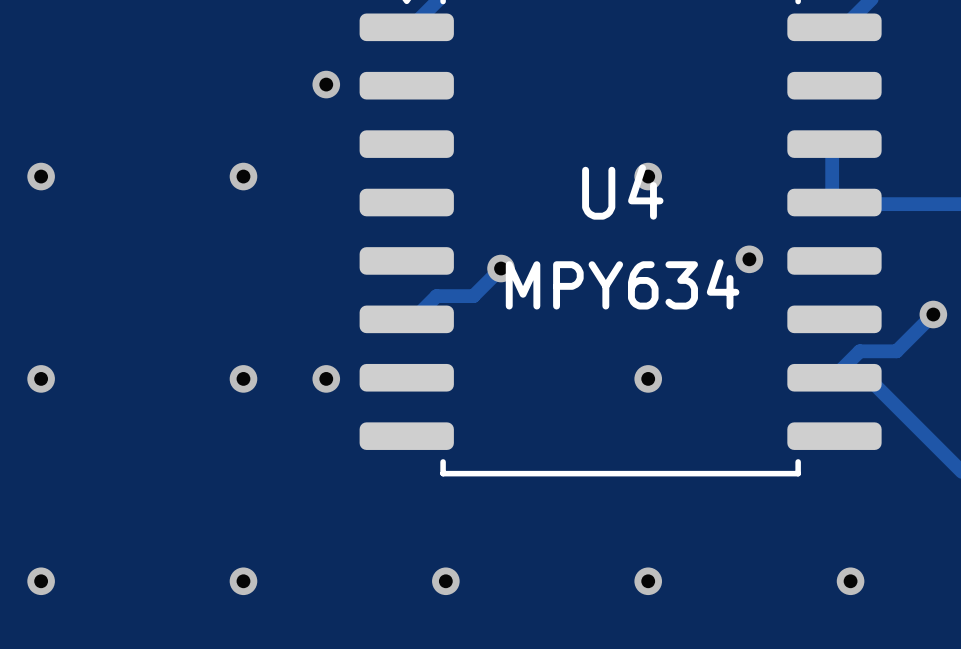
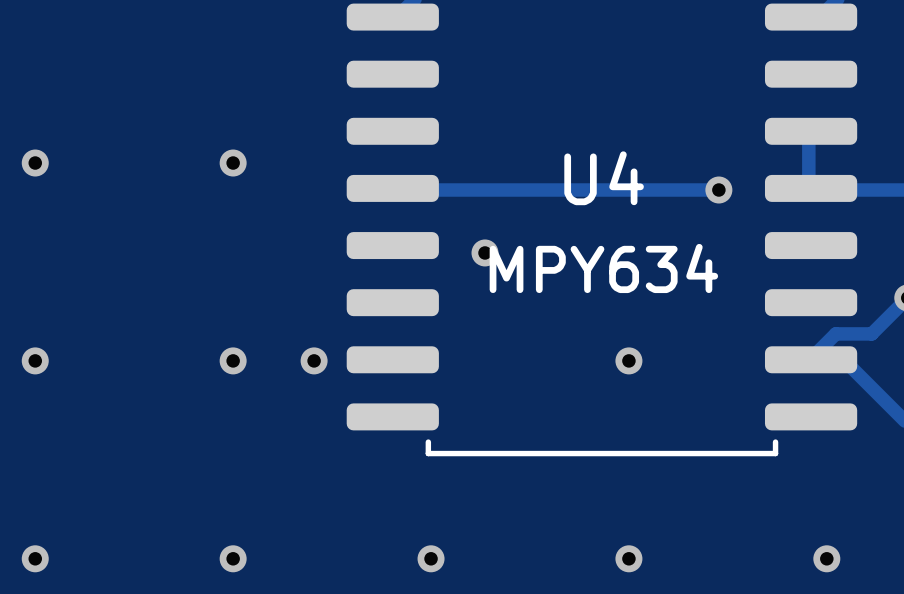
via: (326, 84) -> none
via: (648, 176) -> none
track: none -> (718, 190) (392, 190)
via: none -> (718, 190)
via: (749, 259) -> none
track: (501, 268) (473, 296) (436, 296) (418, 314) (406, 319) -> none

